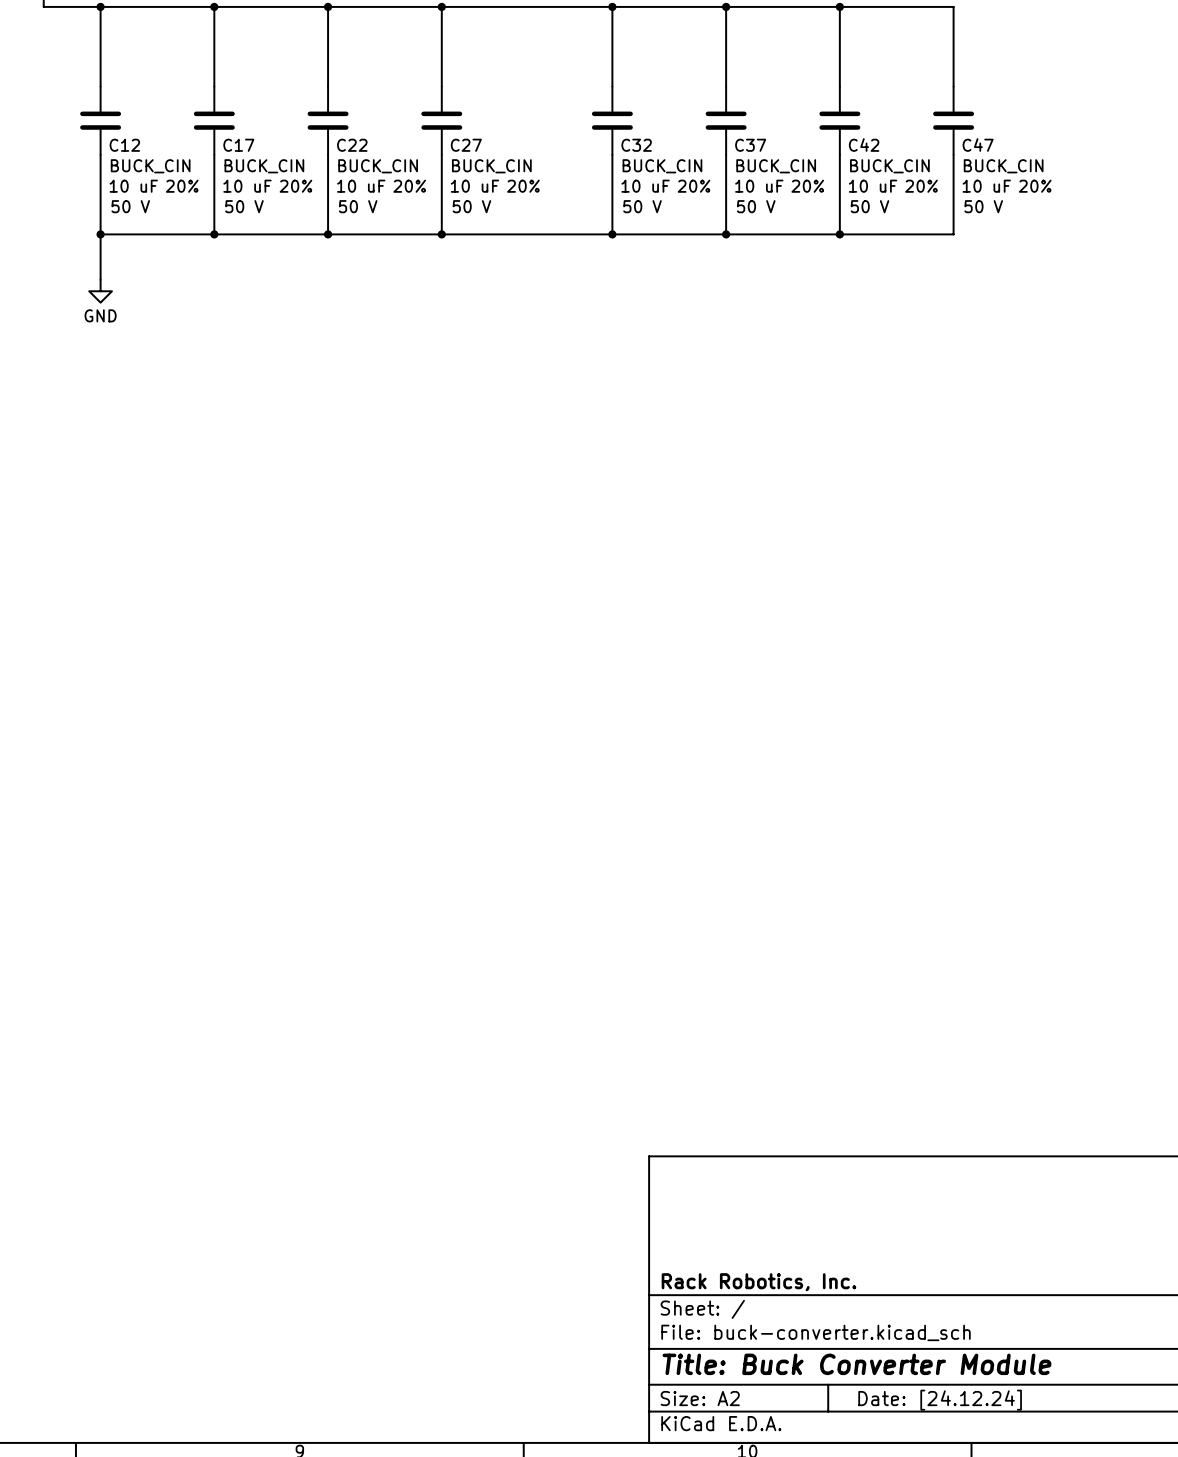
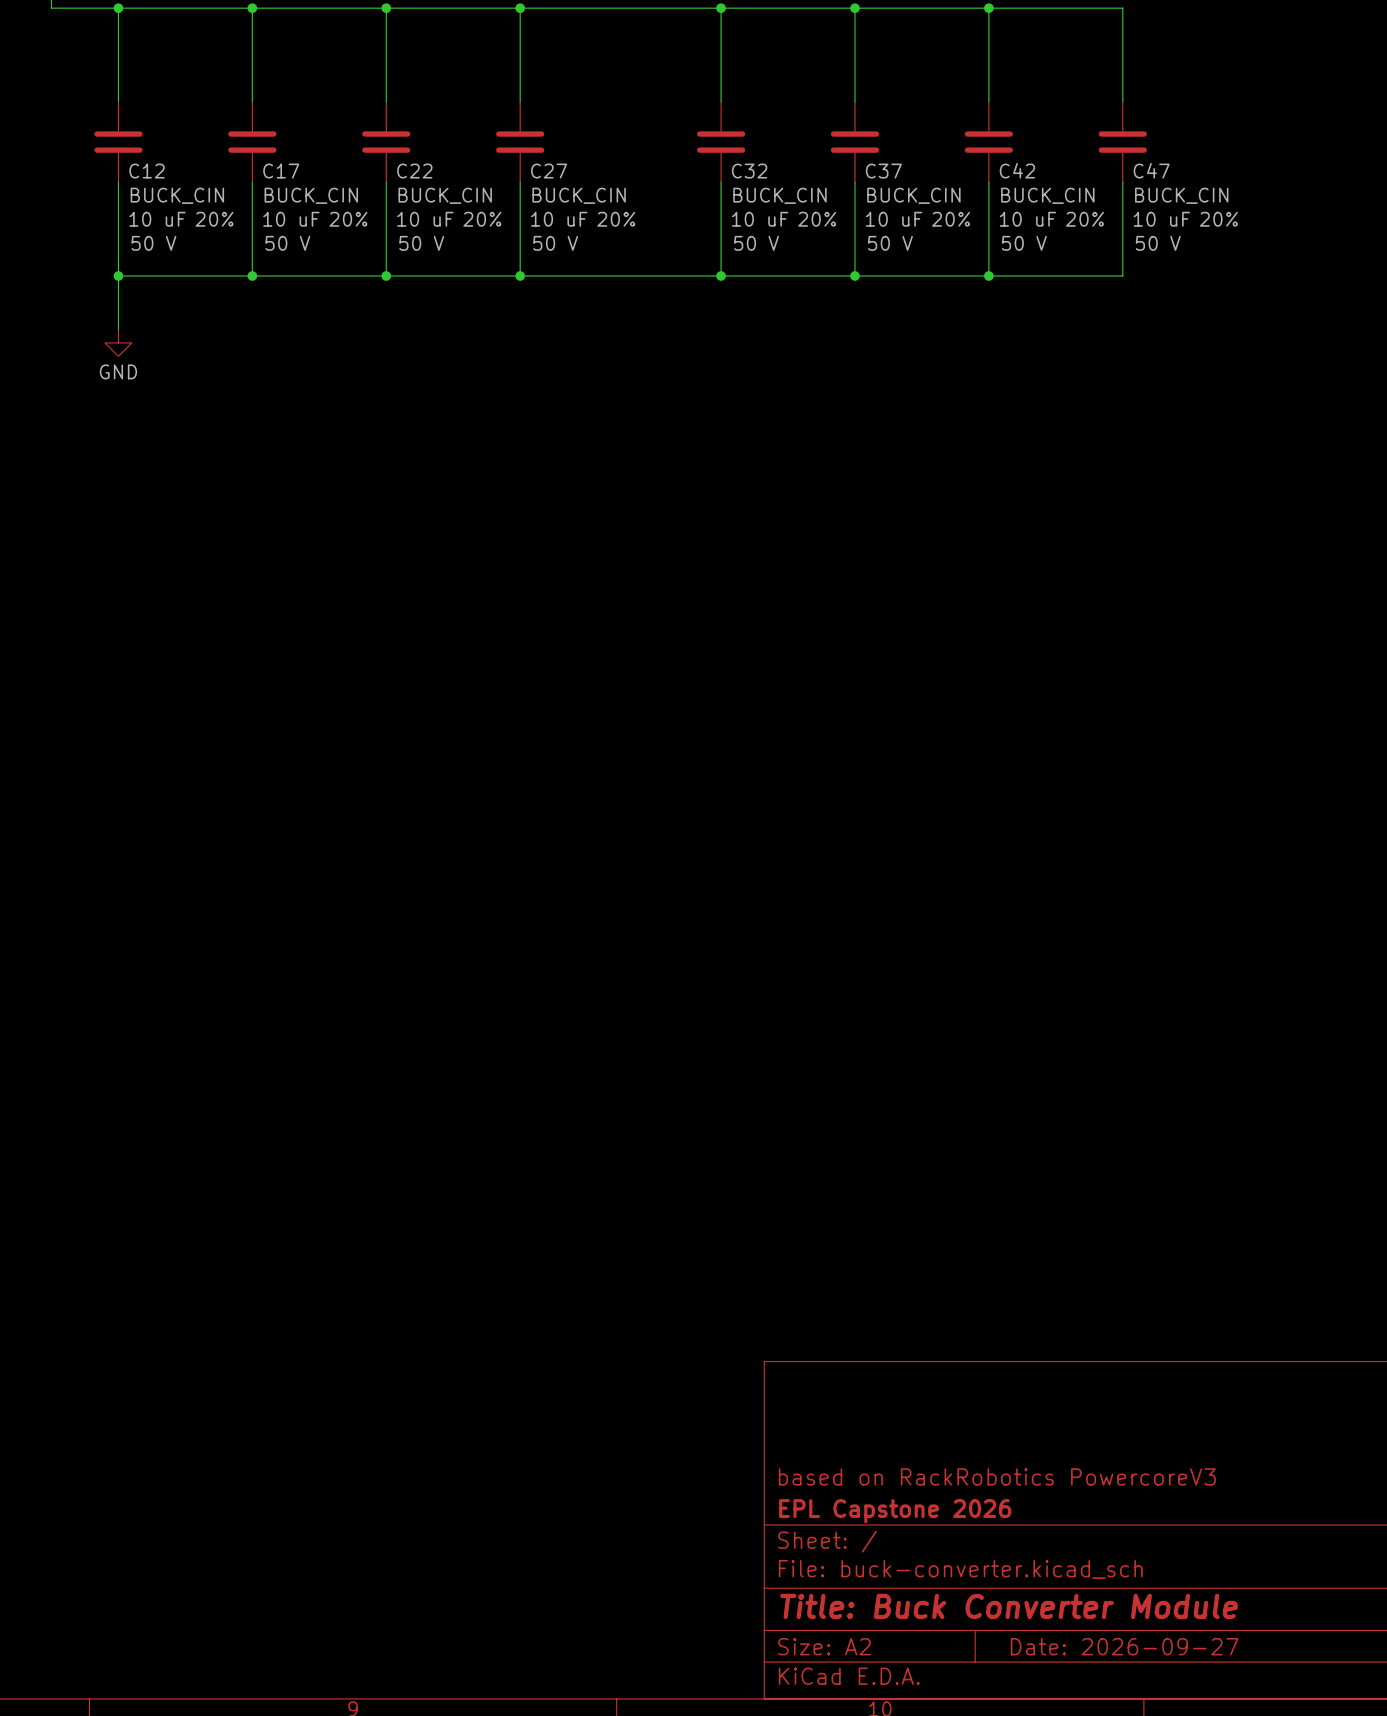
title block: none -> based on RackRobotics PowercoreV3 (997, 1476)
title block: Rack Robotics, Inc. (758, 1282) -> EPL Capstone 2026 (895, 1511)
title block: Date: [24.12.24] (940, 1400) -> Date: 2026-09-27 (1124, 1646)

